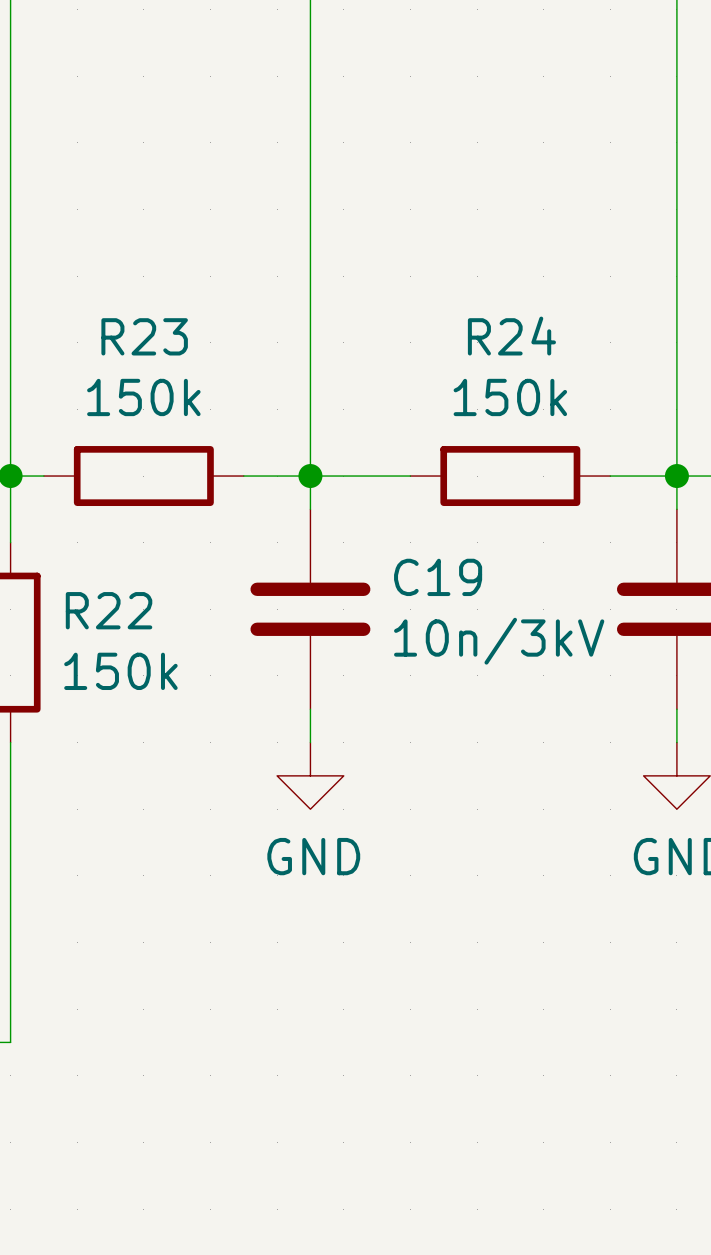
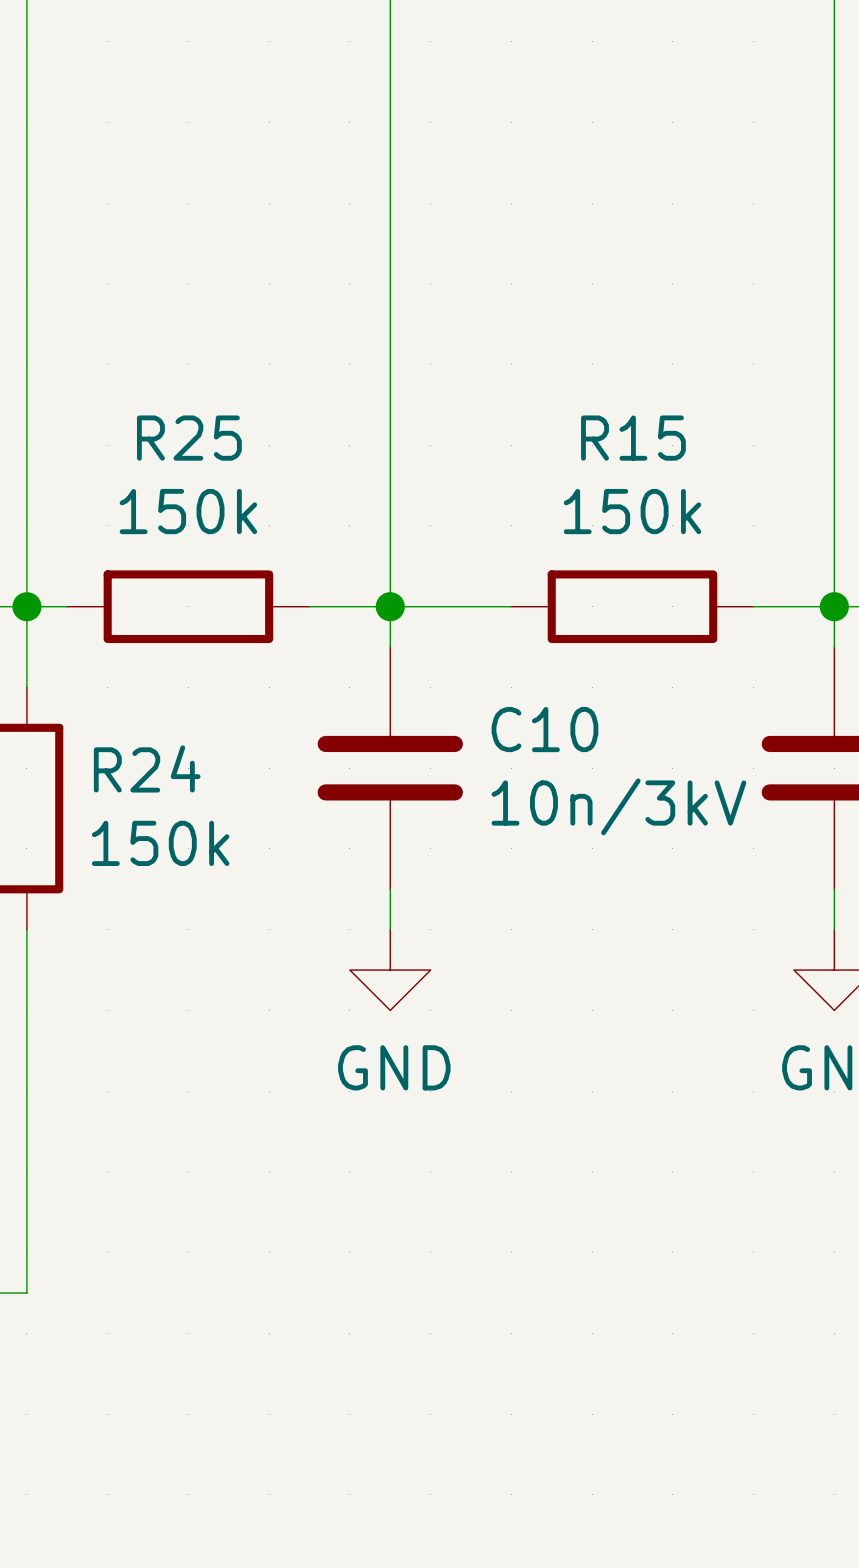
R23 name: R23 (144, 336) -> R25 (189, 438)
R24 name: R24 (511, 336) -> R15 (633, 438)
C19 name: C19 (438, 577) -> C10 (544, 729)
R22 name: R22 (109, 610) -> R24 (147, 768)

